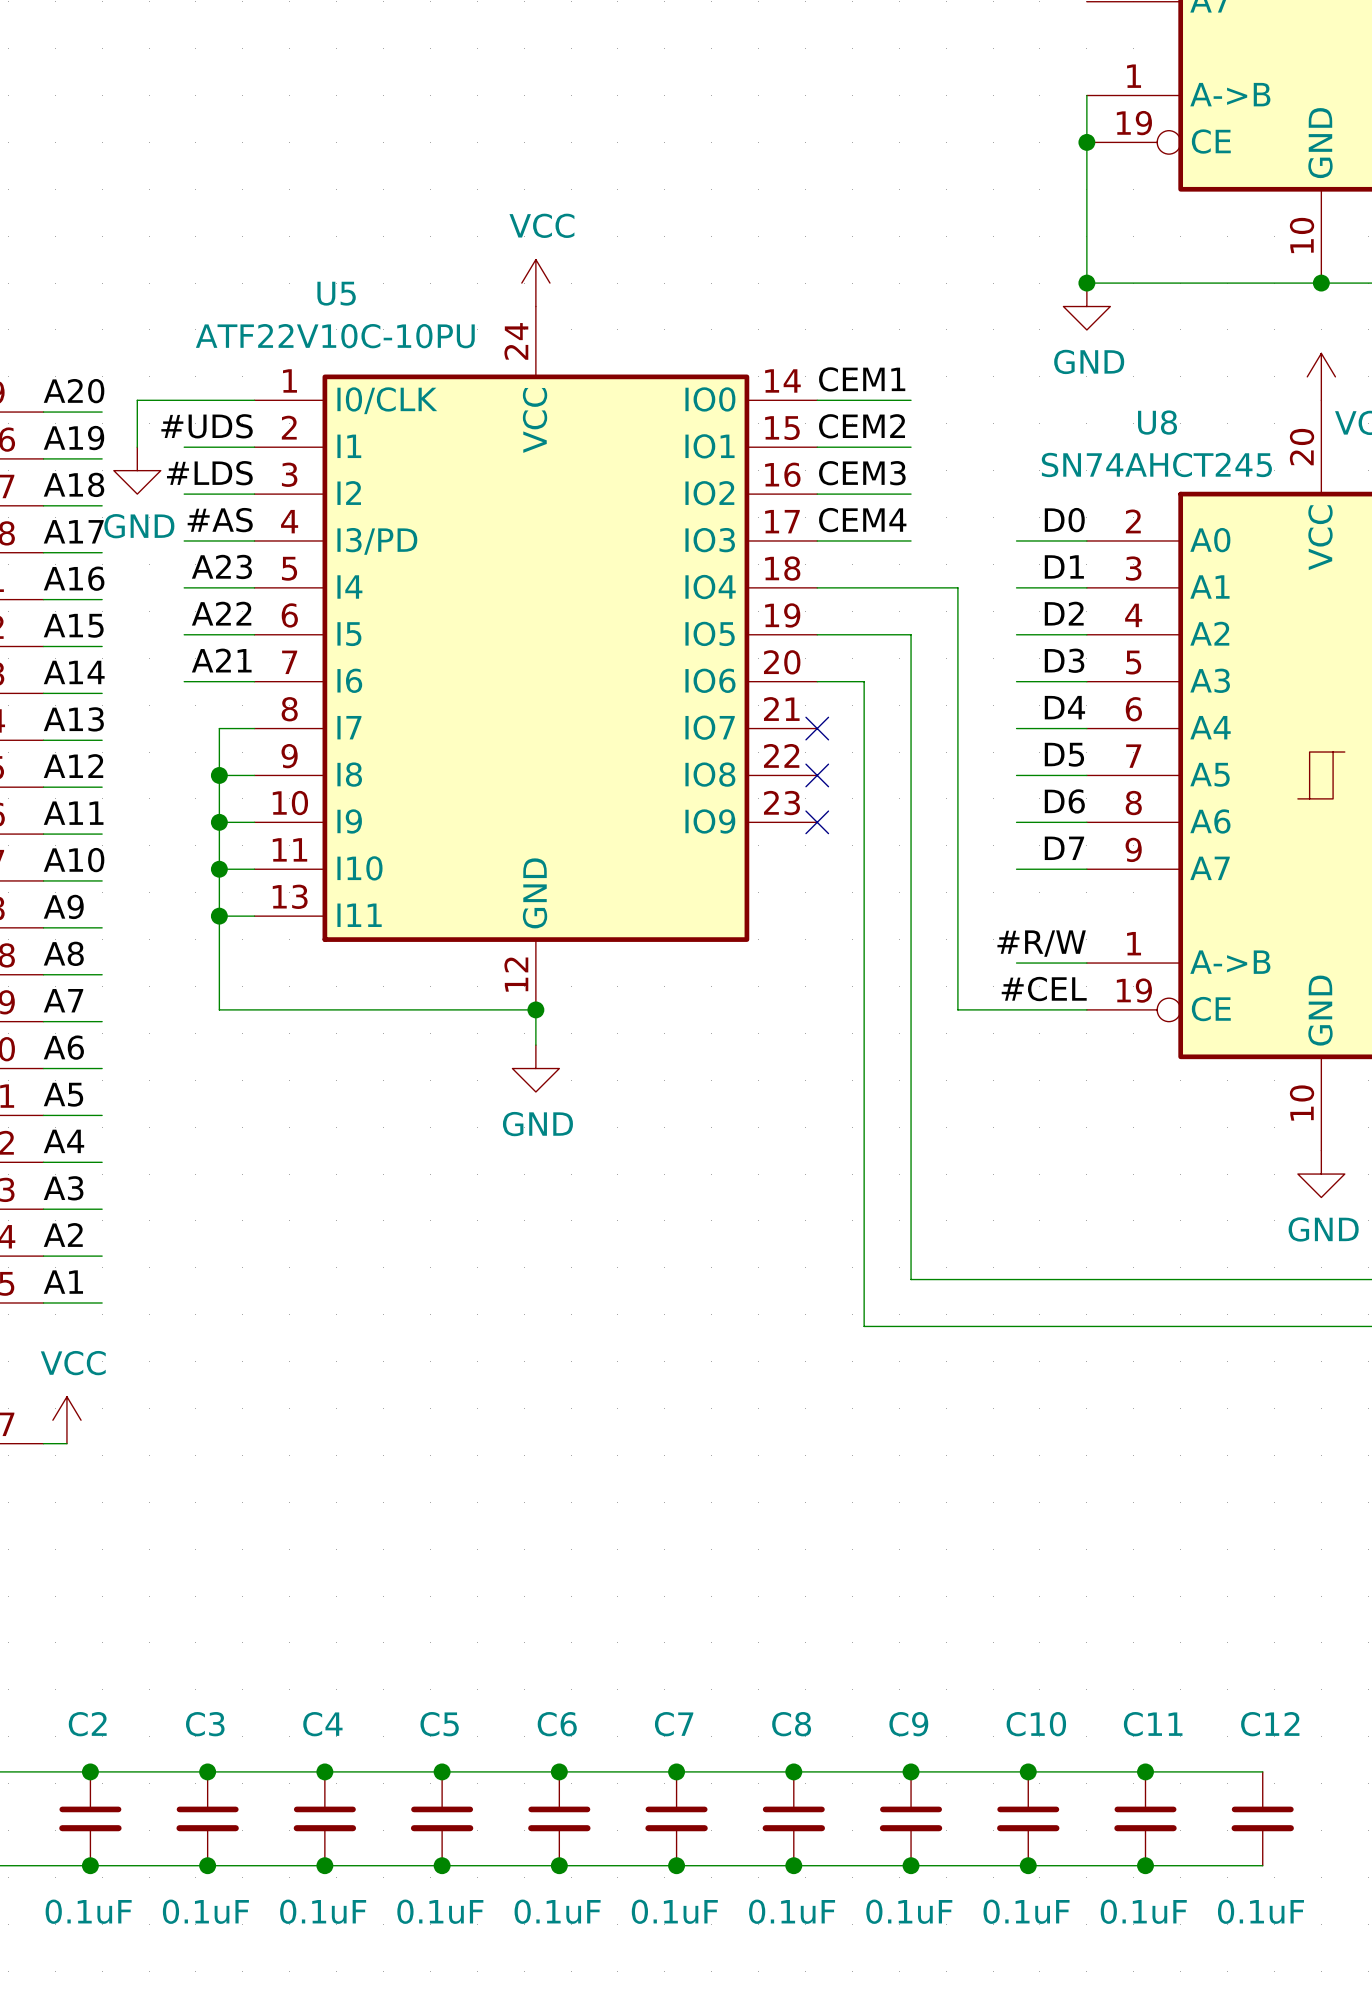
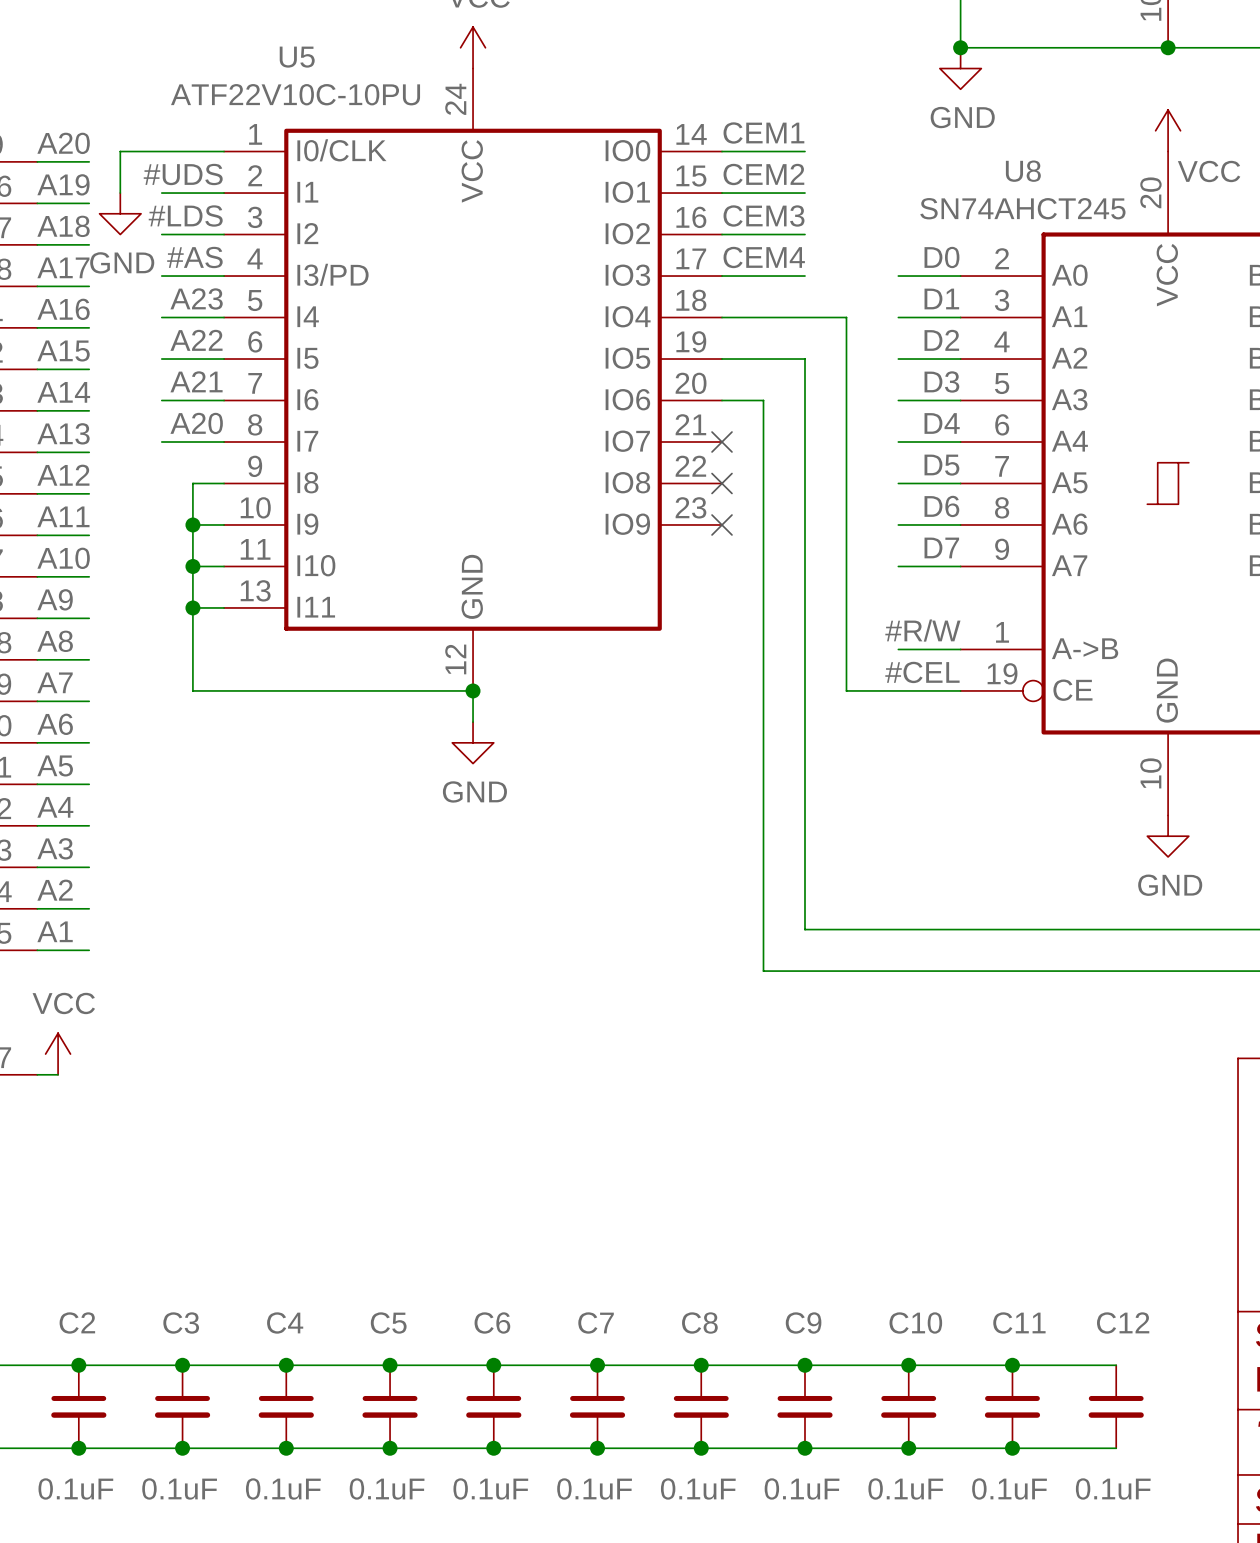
label: none -> A20 (196, 423)
wire: (219, 728) (219, 775) -> (192, 441) (161, 441)
junction: (219, 775) -> none

